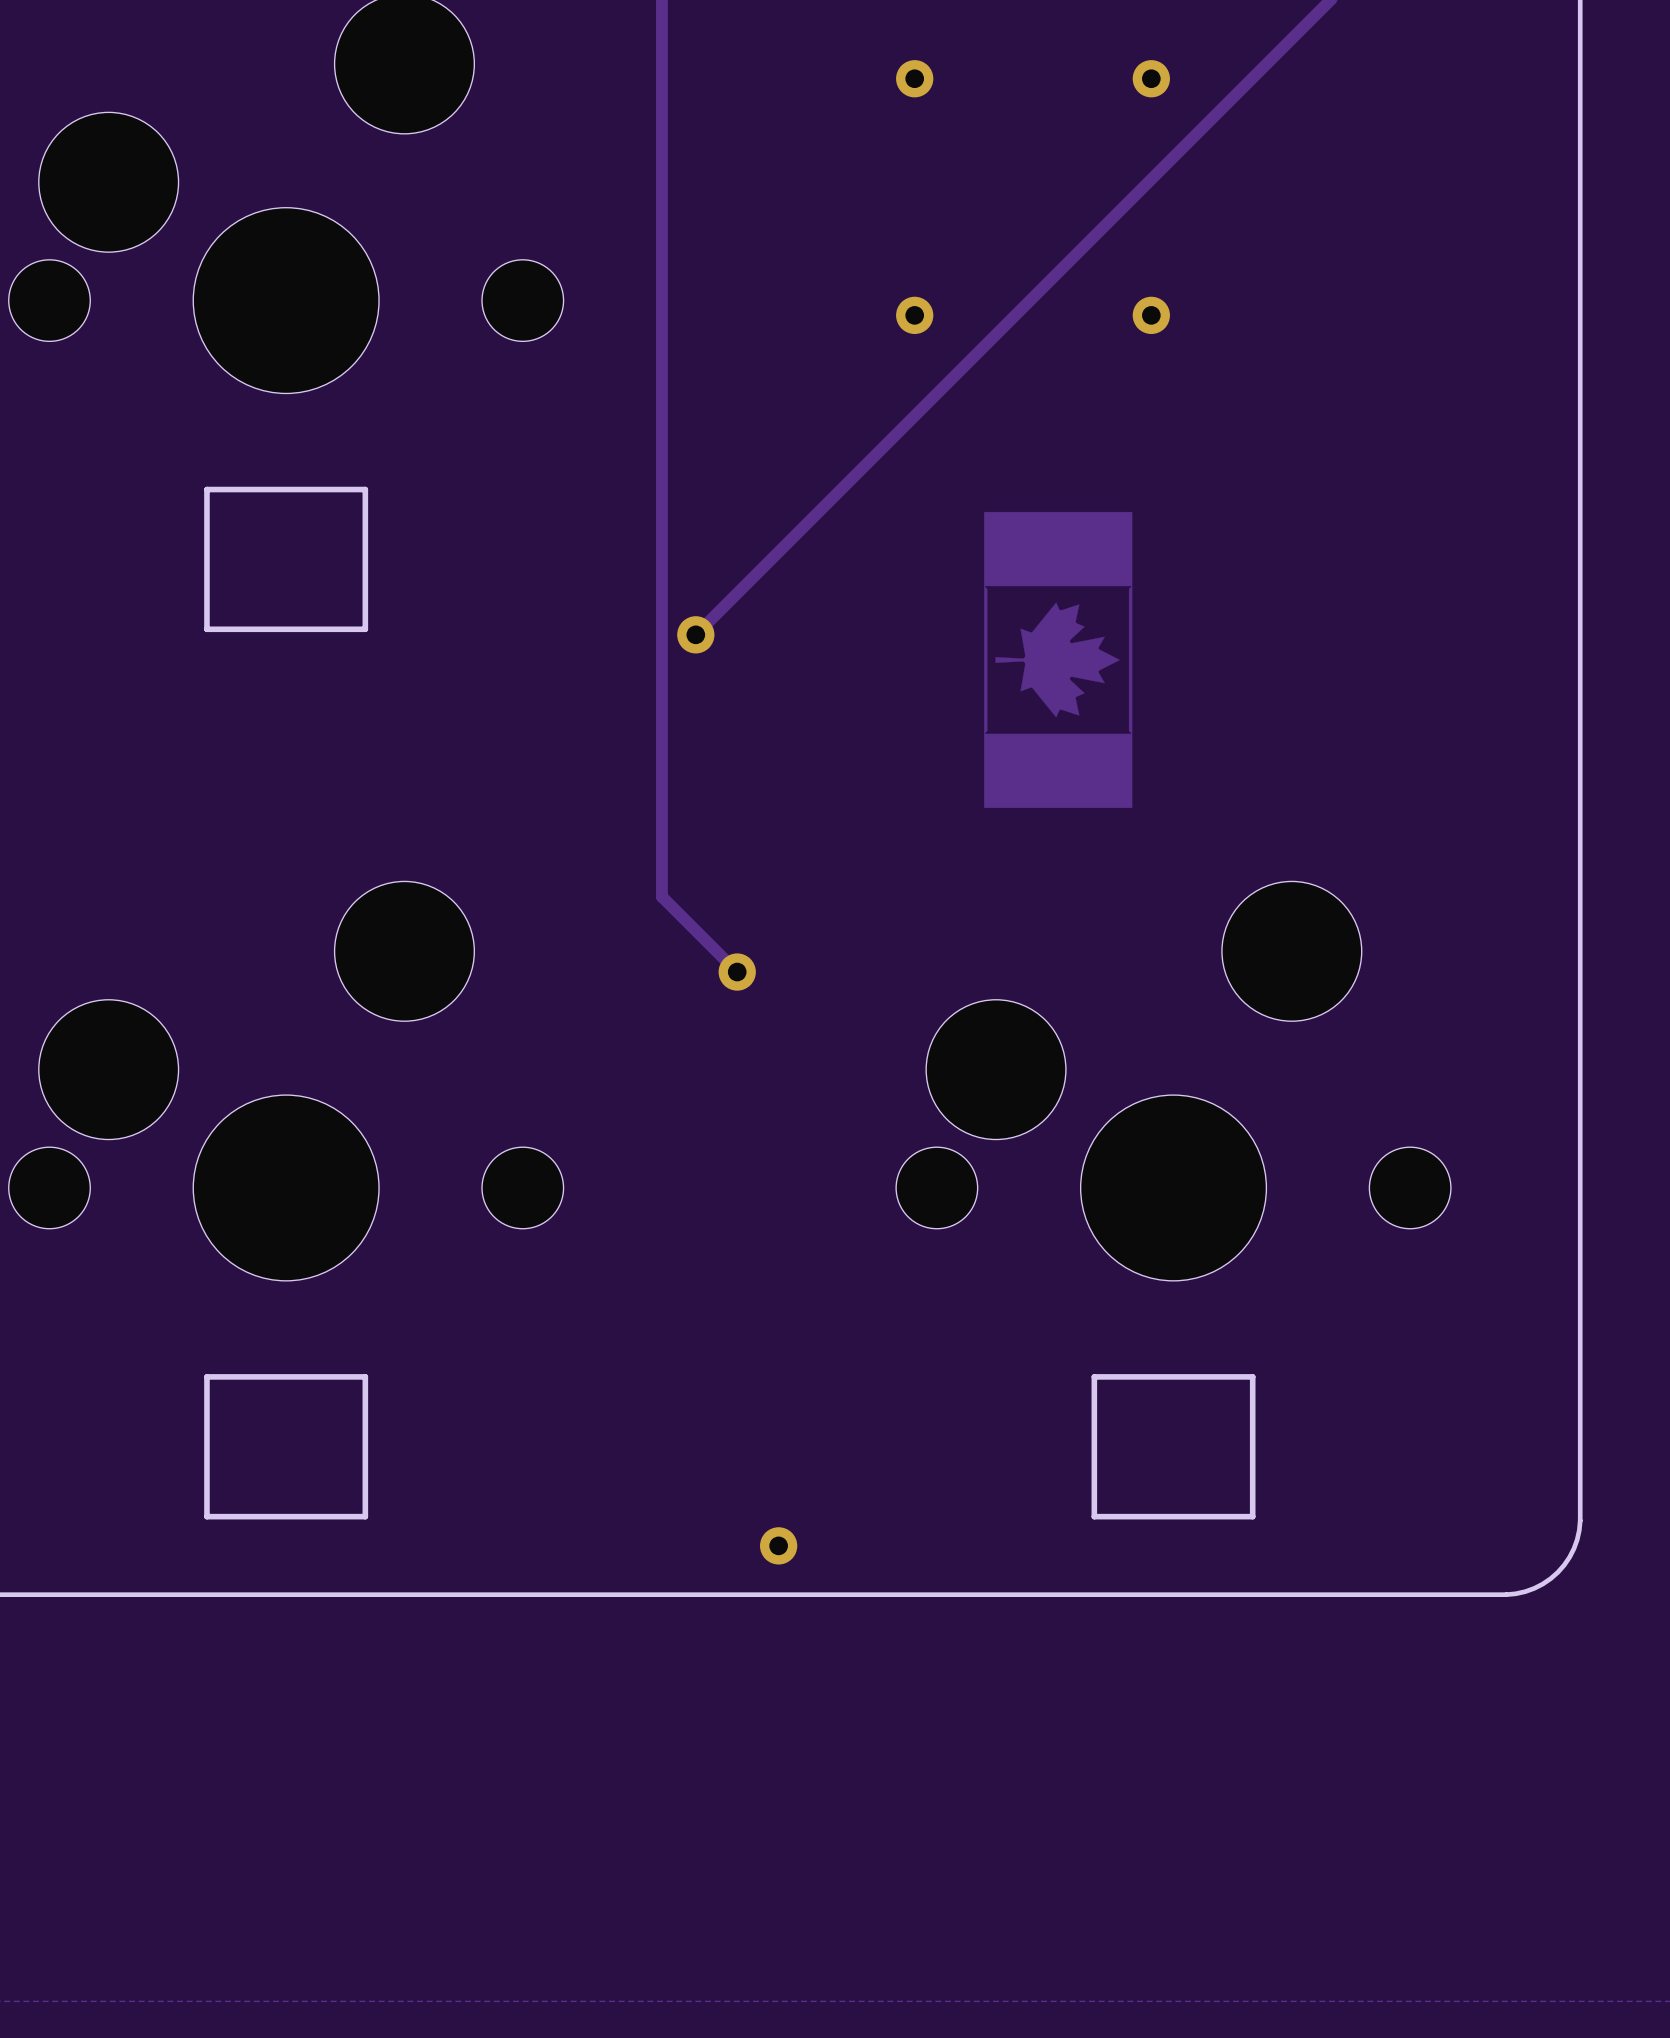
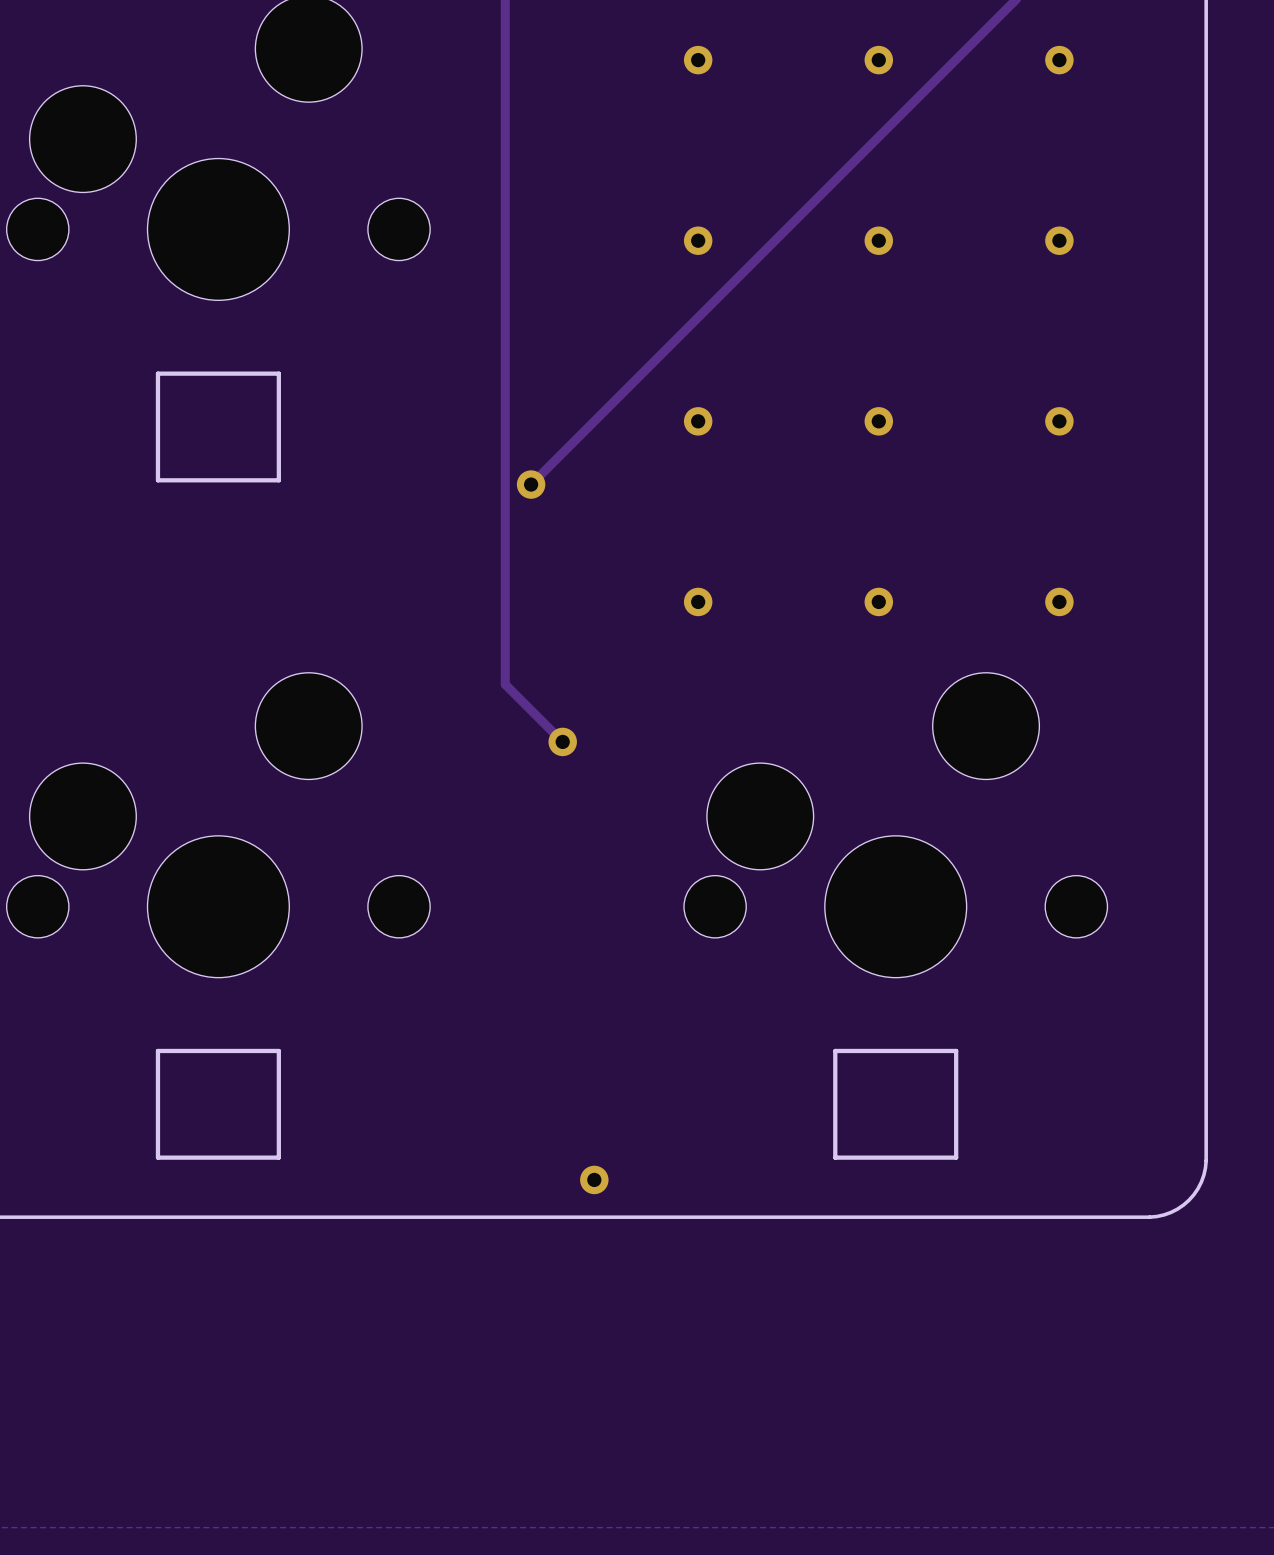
via: none -> (1059, 60)
via: none -> (1059, 240)
drawing: [984, 511, 1133, 809] -> none
via: none -> (698, 421)
via: none -> (878, 421)
via: none -> (1059, 421)
via: none -> (698, 601)
via: none -> (878, 601)
via: none -> (1059, 601)

